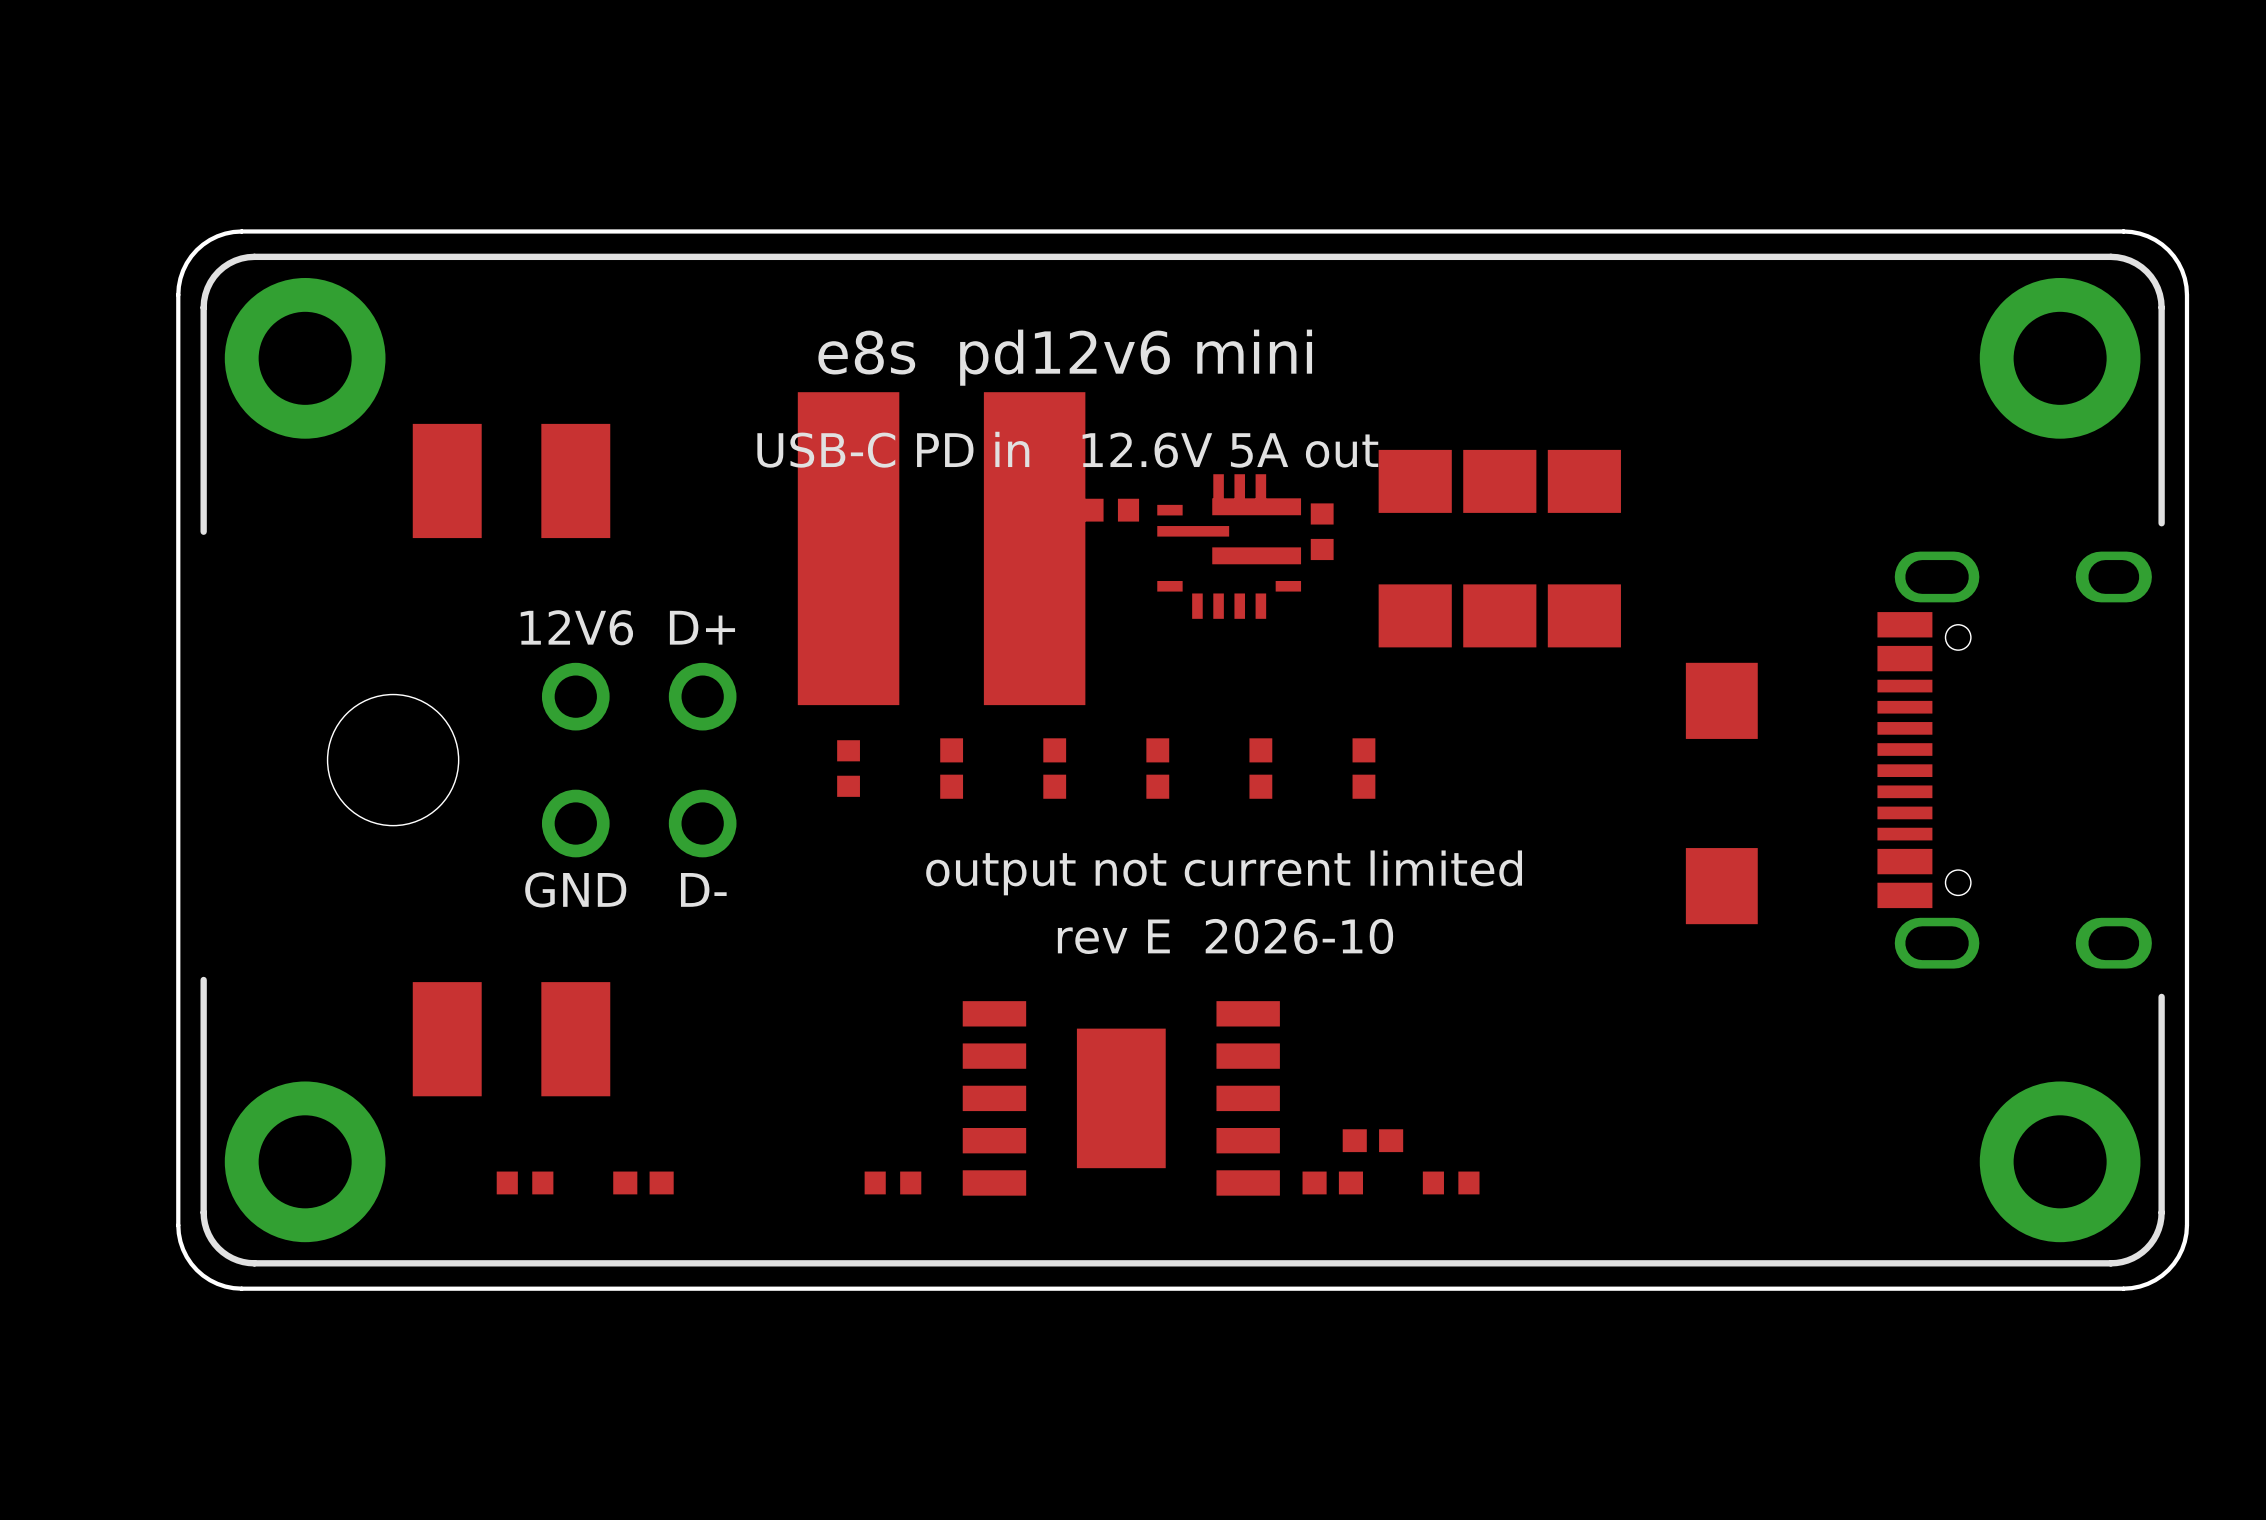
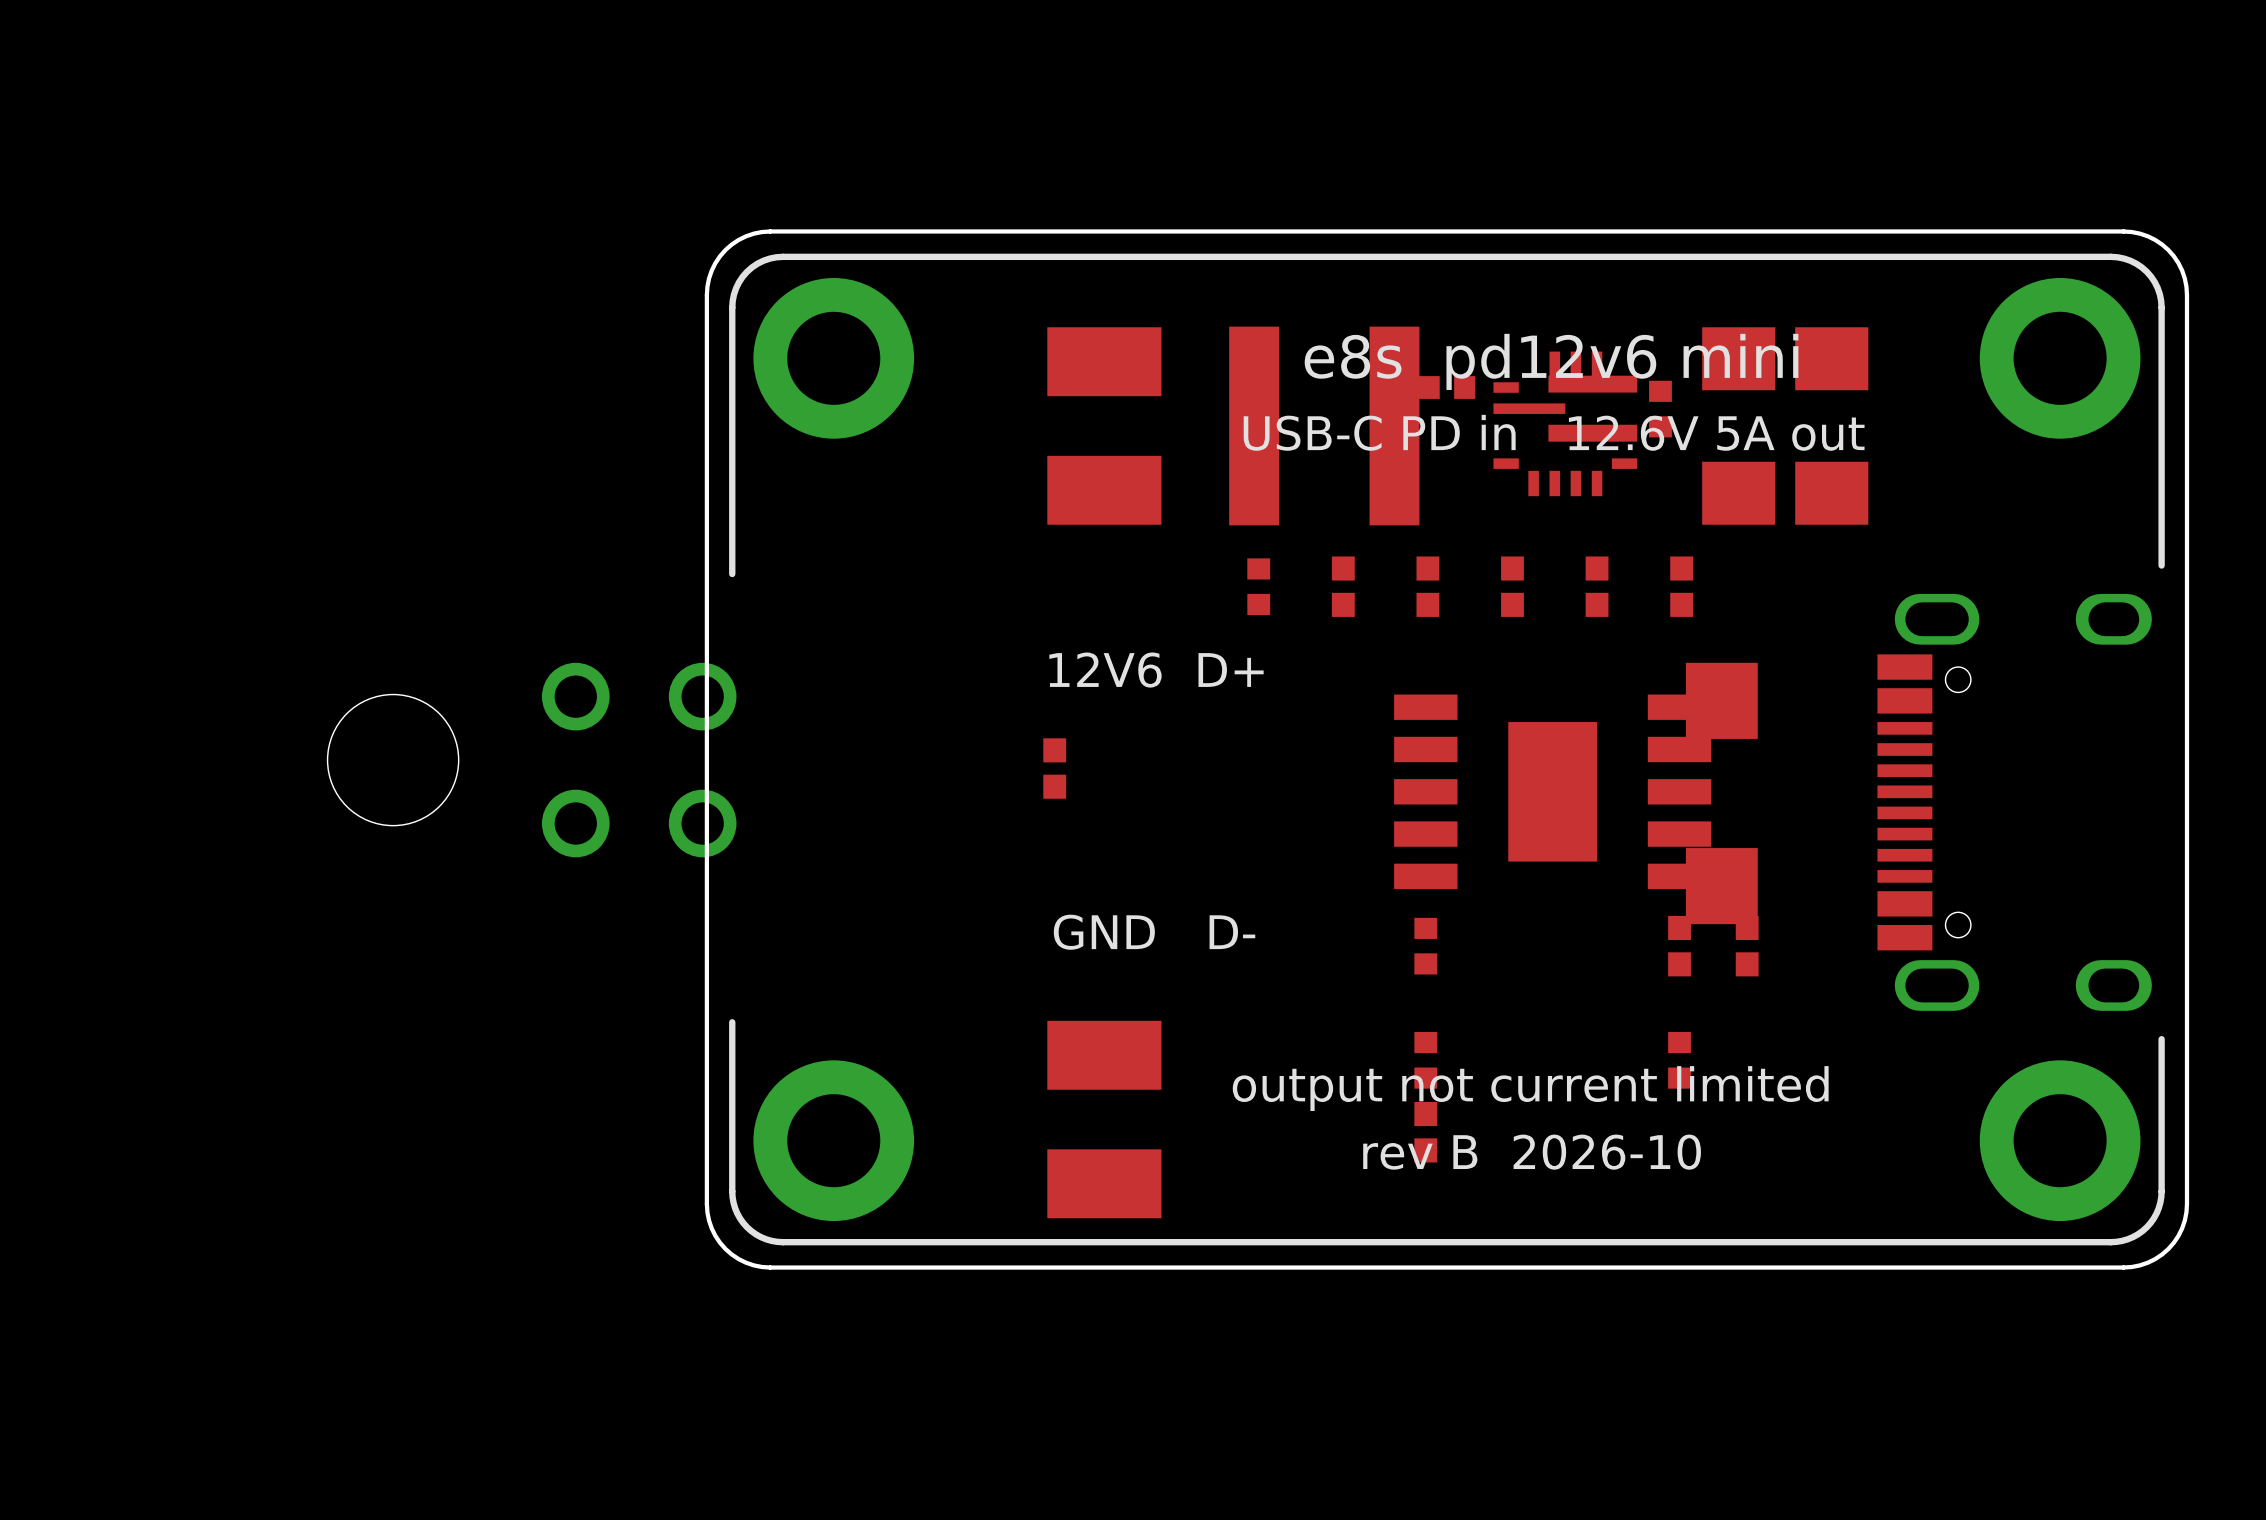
board edge: (770, 231) (241, 231) (225, 233) (210, 239) (196, 250) (186, 263) (180, 278) (178, 294) (178, 1225) (183, 1249) (191, 1263) (203, 1275) (225, 1286) (241, 1288) (2123, 1288) (2139, 1286) (2155, 1280) (2173, 1263) (2184, 1241) (2186, 1204) -> (770, 231) (746, 236) (725, 250) (711, 270) (706, 294) (706, 1204) (709, 1220) (715, 1235) (731, 1254) (753, 1265) (770, 1267) (2123, 1267) (2147, 1262) (2168, 1248) (2182, 1228) (2186, 1204)
line: (783, 256) (254, 256) (234, 260) (223, 267) (214, 276) (207, 288) (204, 300) (203, 531) -> (783, 256) (763, 260) (747, 271) (736, 288) (732, 300) (732, 574)
text position: e8s pd12v6 mini (1065, 357) -> e8s pd12v6 mini (1551, 361)
part: (305, 358) -> none
part: none -> (833, 358)
part: none -> (1446, 387)
part: none -> (1660, 409)
part: none -> (1104, 426)
part: none -> (1324, 426)
part: none -> (1738, 426)
part: none -> (1831, 426)
text position: USB-C PD in 12.6V 5A out (1067, 449) -> USB-C PD in 12.6V 5A out (1554, 432)
part footprint: [1378, 449, 1452, 648] -> [1416, 556, 1440, 617]
part footprint: [1463, 449, 1537, 648] -> [1501, 556, 1524, 617]
part footprint: [1547, 449, 1621, 648] -> [1585, 556, 1609, 617]
part: (511, 480) -> none
part: (1110, 510) -> none
part: (1322, 531) -> none
part position: (1229, 546) -> (1565, 423)
part: (941, 548) -> none
part: none -> (1258, 586)
part: none -> (1343, 586)
part: none -> (1681, 586)
text position: 12V6 (576, 627) -> 12V6 (1105, 670)
text position: D+ (702, 627) -> D+ (1231, 670)
part position: (2014, 760) -> (2014, 802)
part: (848, 768) -> none
part: (951, 768) -> none
part: (1157, 768) -> none
part: (1260, 768) -> none
part: (1363, 768) -> none
part: none -> (1552, 791)
text position: output not current limited (1224, 872) -> output not current limited (1530, 1088)
text position: GND (575, 889) -> GND (1104, 932)
text position: D- (703, 889) -> D- (1232, 932)
text: rev E 2026-10 (1225, 936) -> none
part: none -> (1425, 946)
part: none -> (1679, 946)
part: none -> (1747, 946)
line: (203, 979) (203, 1218) (208, 1234) (218, 1248) (232, 1258) (248, 1263) (2110, 1263) (2132, 1258) (2142, 1252) (2153, 1239) (2161, 1218) (2161, 1191) -> (732, 1022) (733, 1202) (737, 1213) (747, 1227) (760, 1237) (777, 1241) (2110, 1242) (2127, 1239) (2146, 1227) (2156, 1213) (2161, 1191)
line: (2161, 996) (2161, 1039) -> (2161, 523) (2161, 565)
part footprint: [962, 1001, 1280, 1196] -> [1047, 1020, 1162, 1219]
part: (511, 1039) -> none
part: none -> (1425, 1060)
part: none -> (1679, 1060)
part: none -> (1425, 1132)
part: none -> (833, 1140)
part: (1372, 1140) -> none
text: none -> rev B 2026-10 (1532, 1152)
part: (305, 1161) -> none
part position: (2060, 1161) -> (2060, 1140)
part: (525, 1182) -> none
part: (643, 1182) -> none
part: (892, 1182) -> none
part: (1332, 1182) -> none
part: (1451, 1182) -> none

